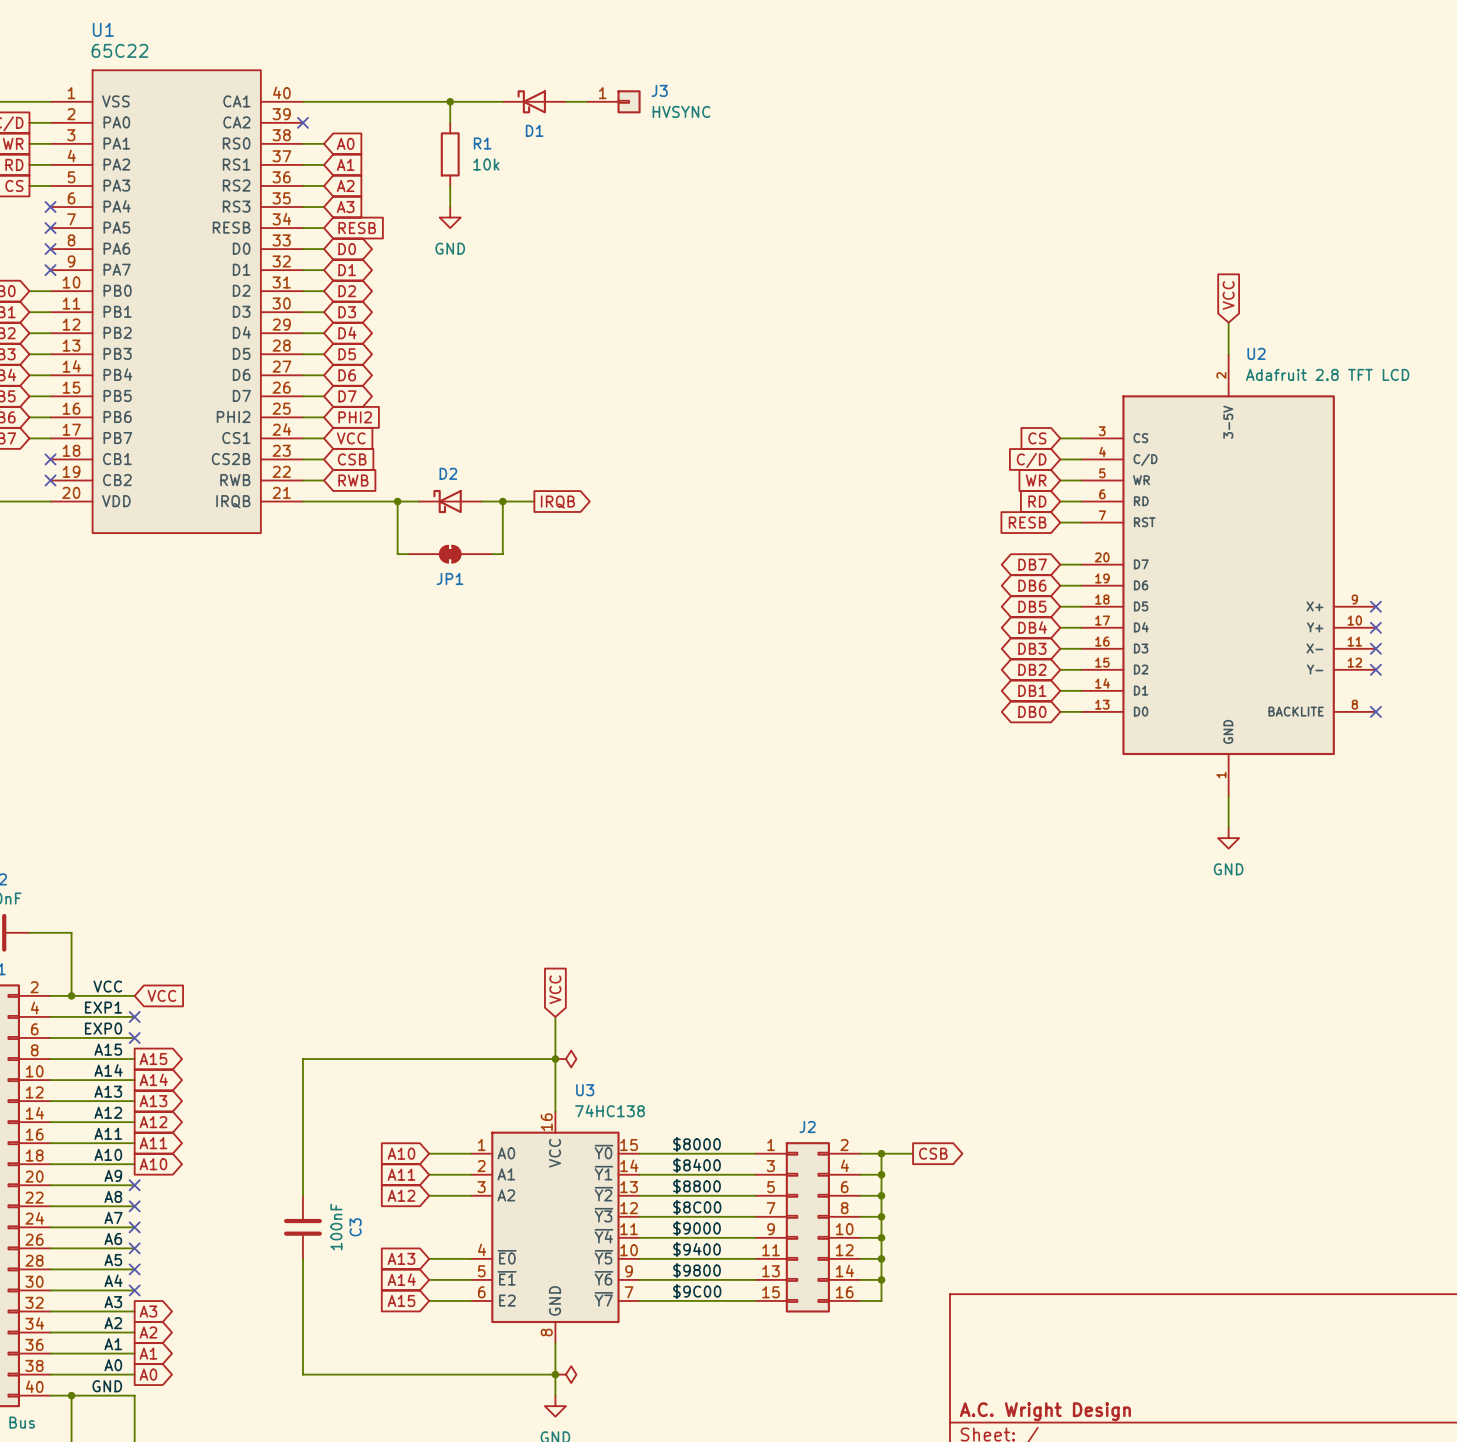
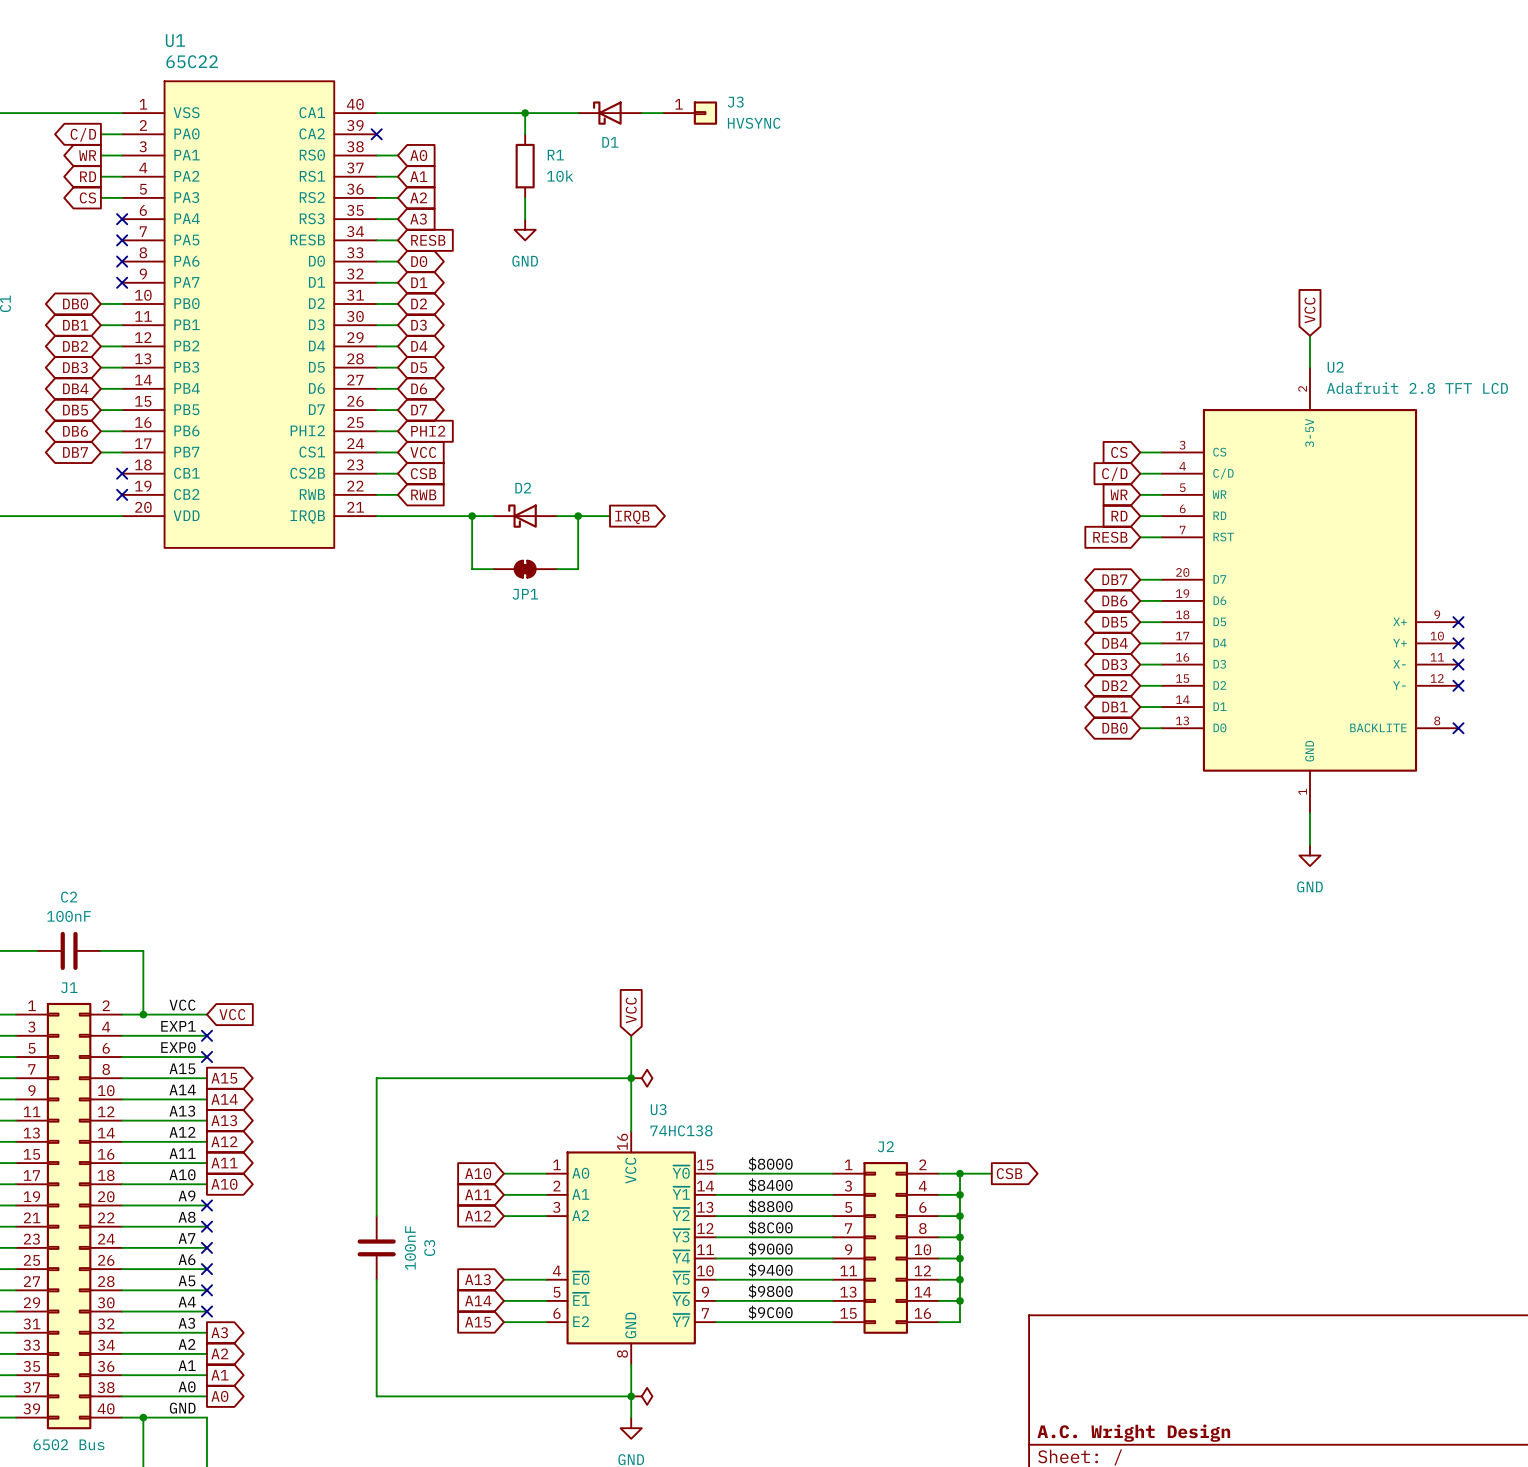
JP1 symbol: [408, 545, 493, 564] -> [493, 560, 557, 578]

